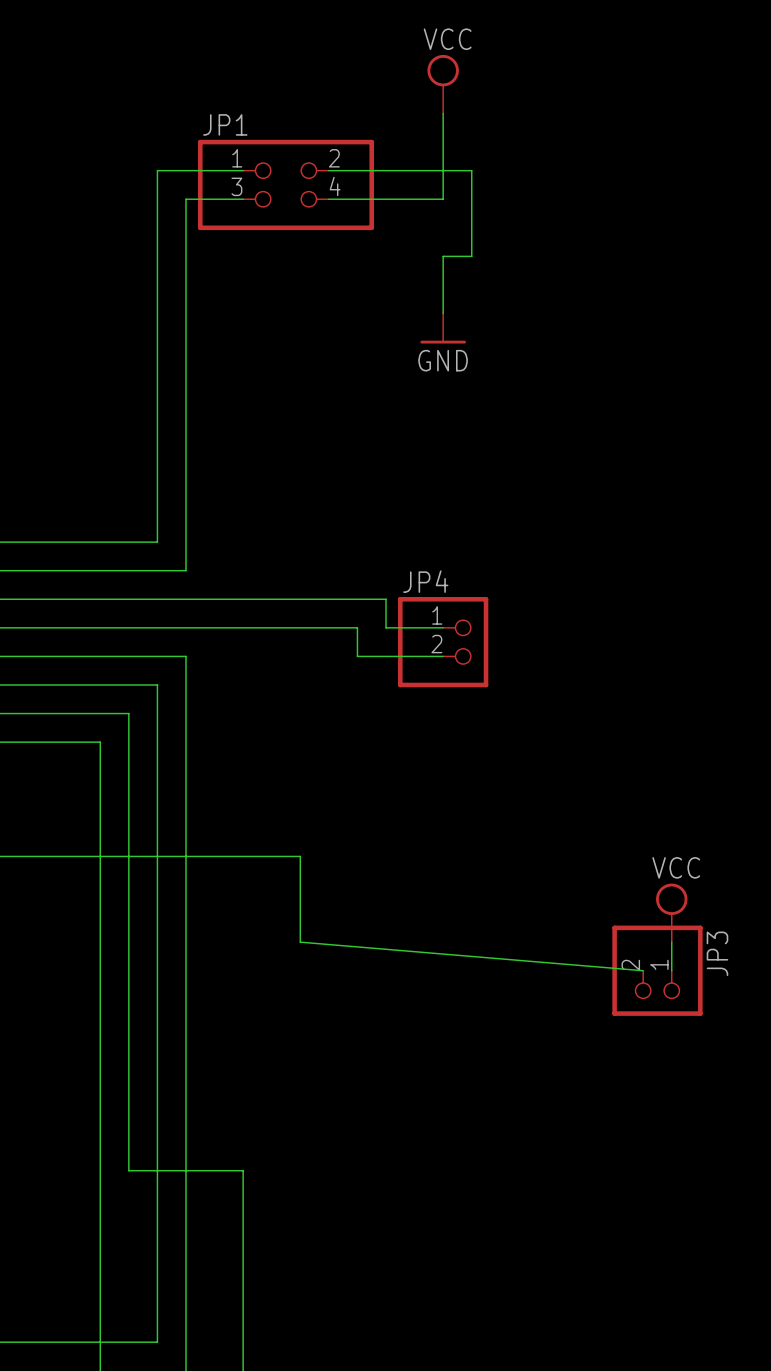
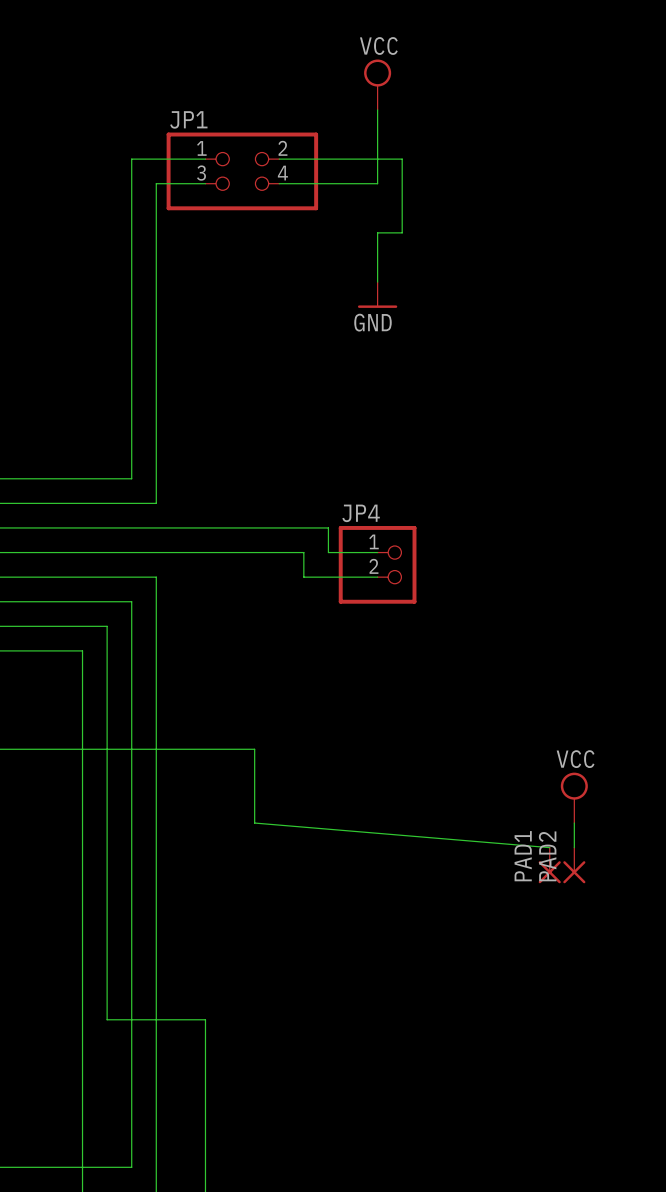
JP3: (657, 970) -> none
PAD1: none -> (549, 865)
PAD2: none -> (574, 865)

